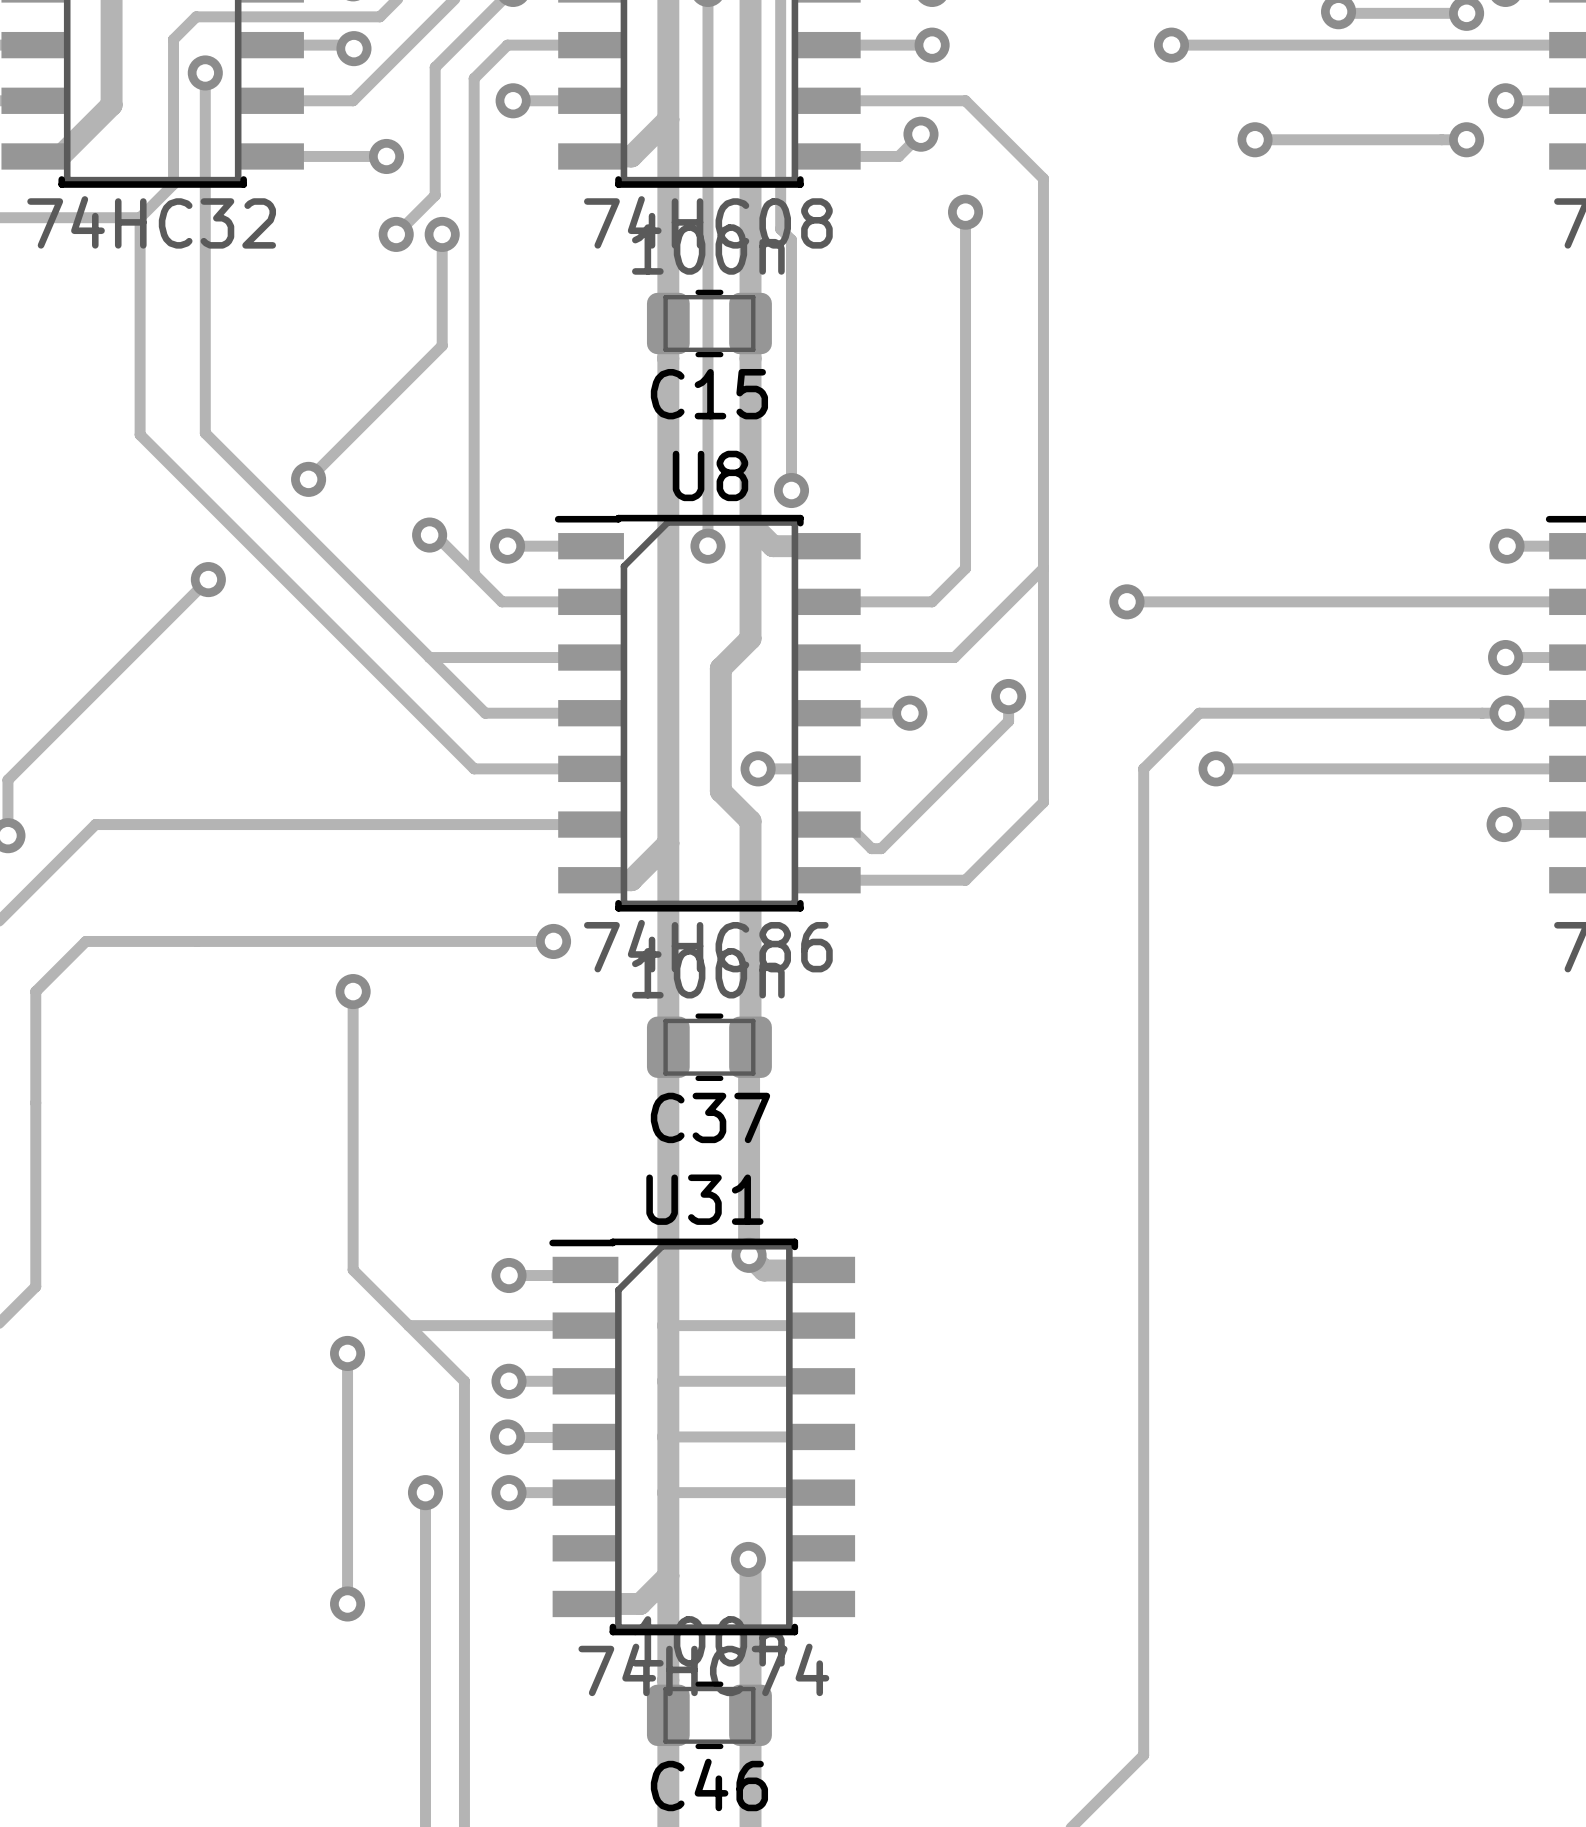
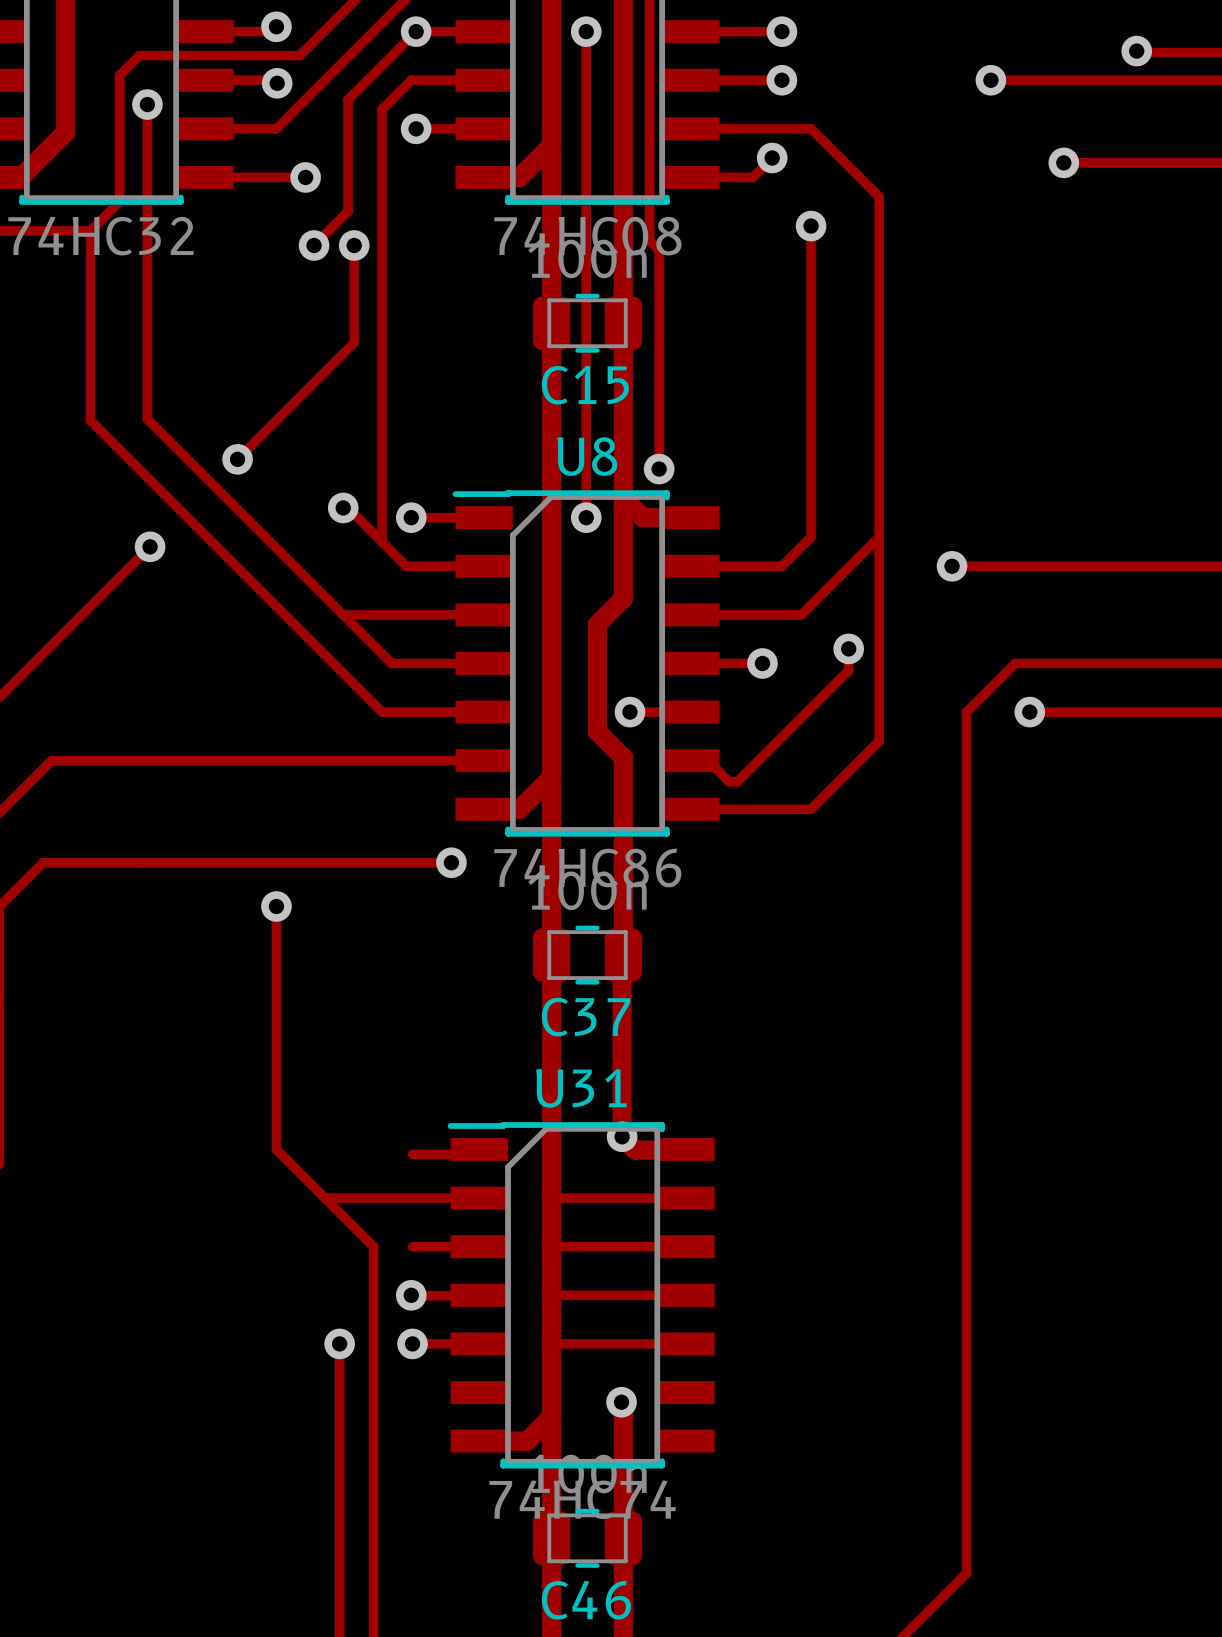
via: (509, 1275) -> none
track: (347, 1353) (347, 1603) -> none
via: (347, 1353) -> none
via: (509, 1381) -> none
via: (347, 1603) -> none

